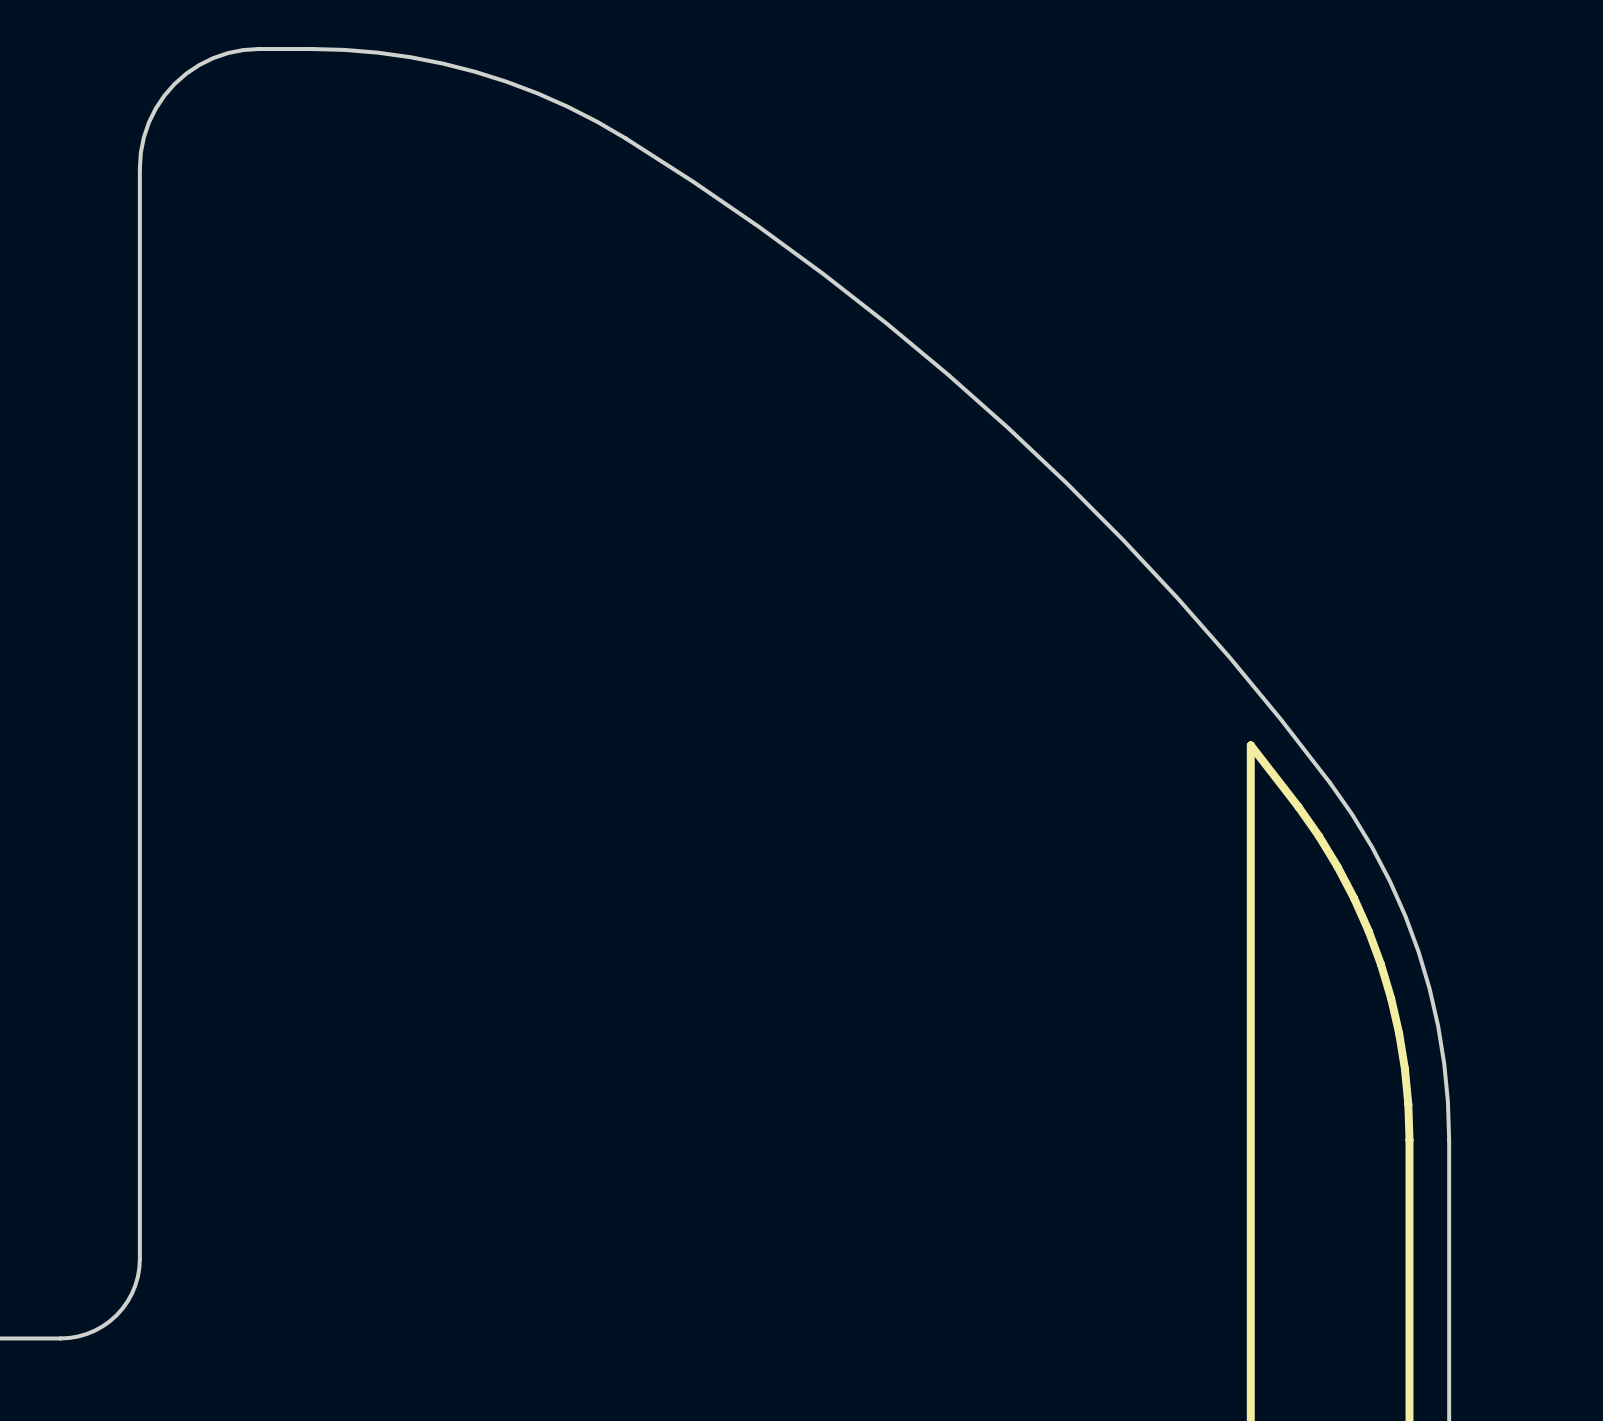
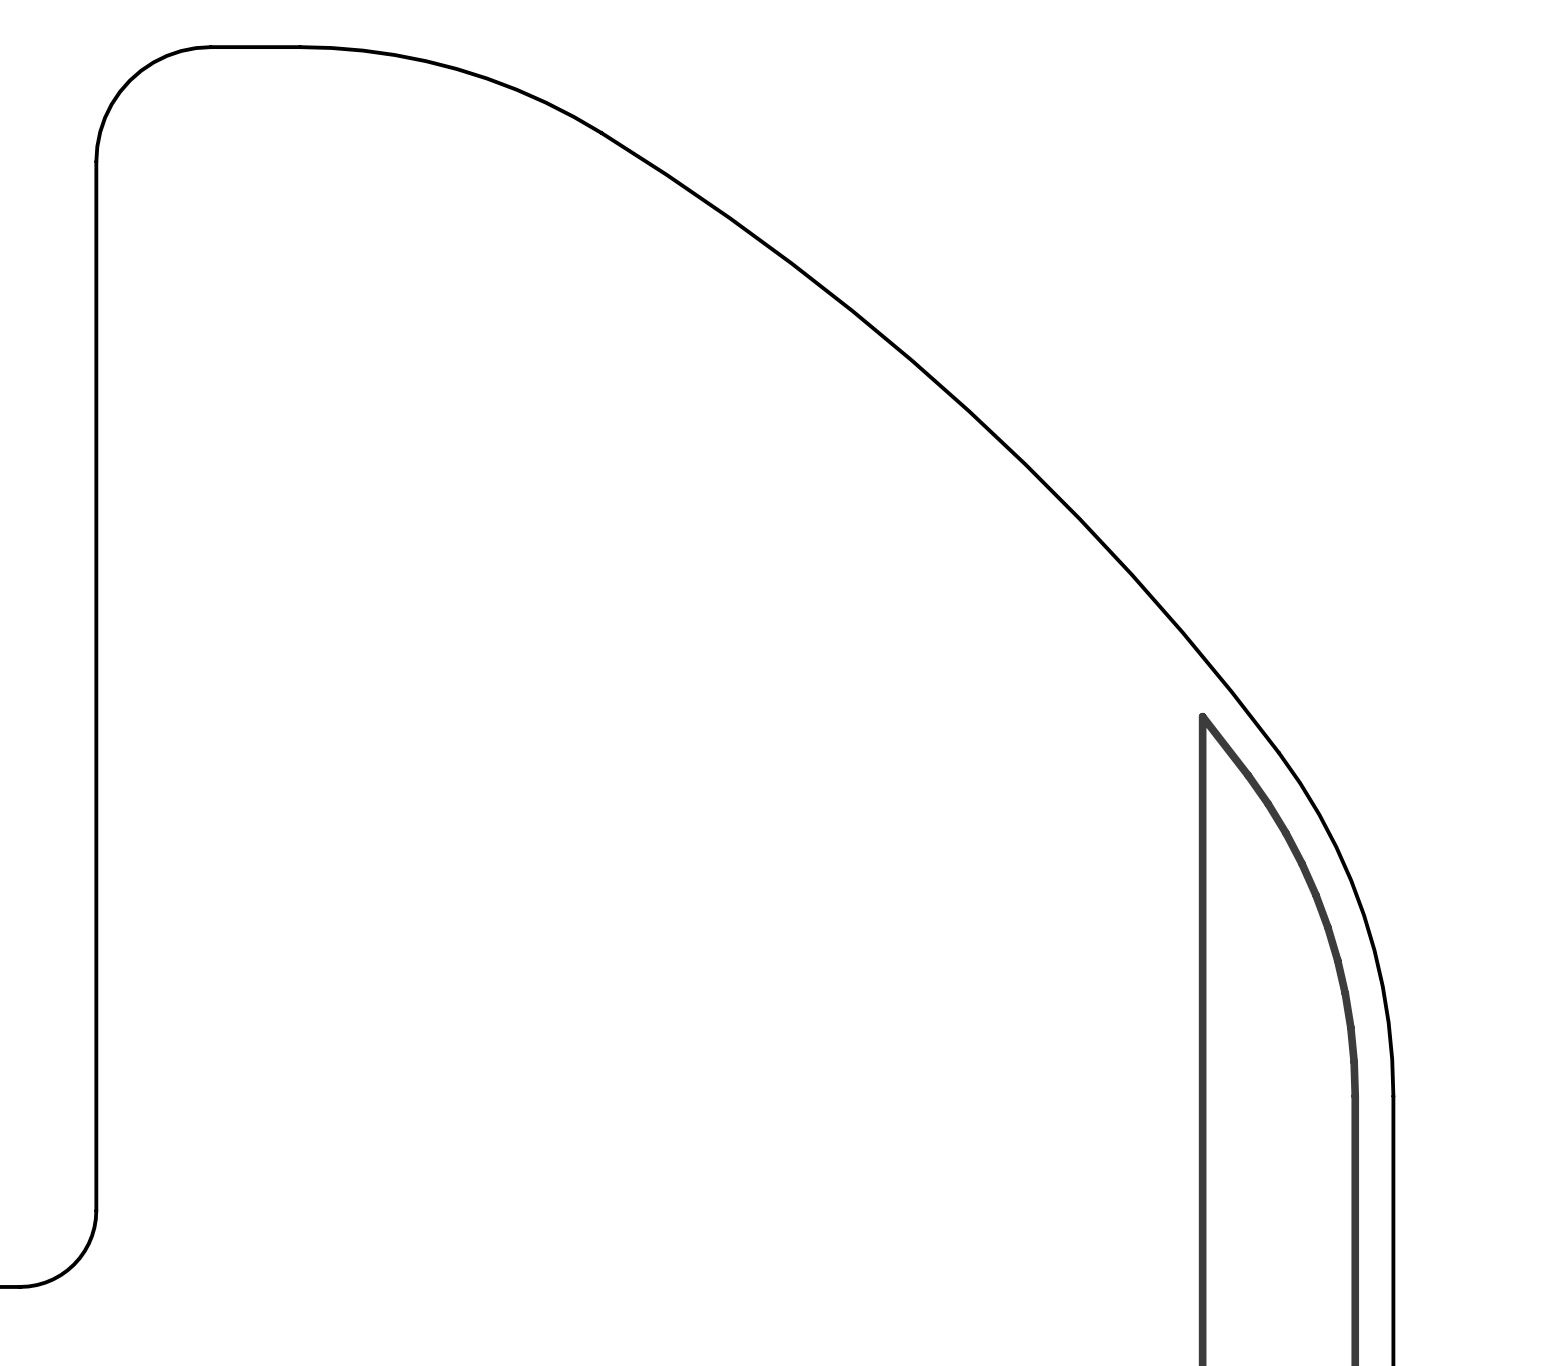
board edge: (258, 49) (228, 53) (213, 58) (186, 73) (174, 83) (155, 108) (143, 137) (140, 152) (139, 1259) (137, 1276) (132, 1293) (122, 1308) (109, 1321) (94, 1330) (69, 1337) (20, 1338) -> (248, 47) (195, 48) (166, 55) (153, 62) (129, 80) (111, 104) (105, 117) (97, 146) (95, 1219) (92, 1235) (84, 1251) (67, 1270) (45, 1282) (20, 1286)

